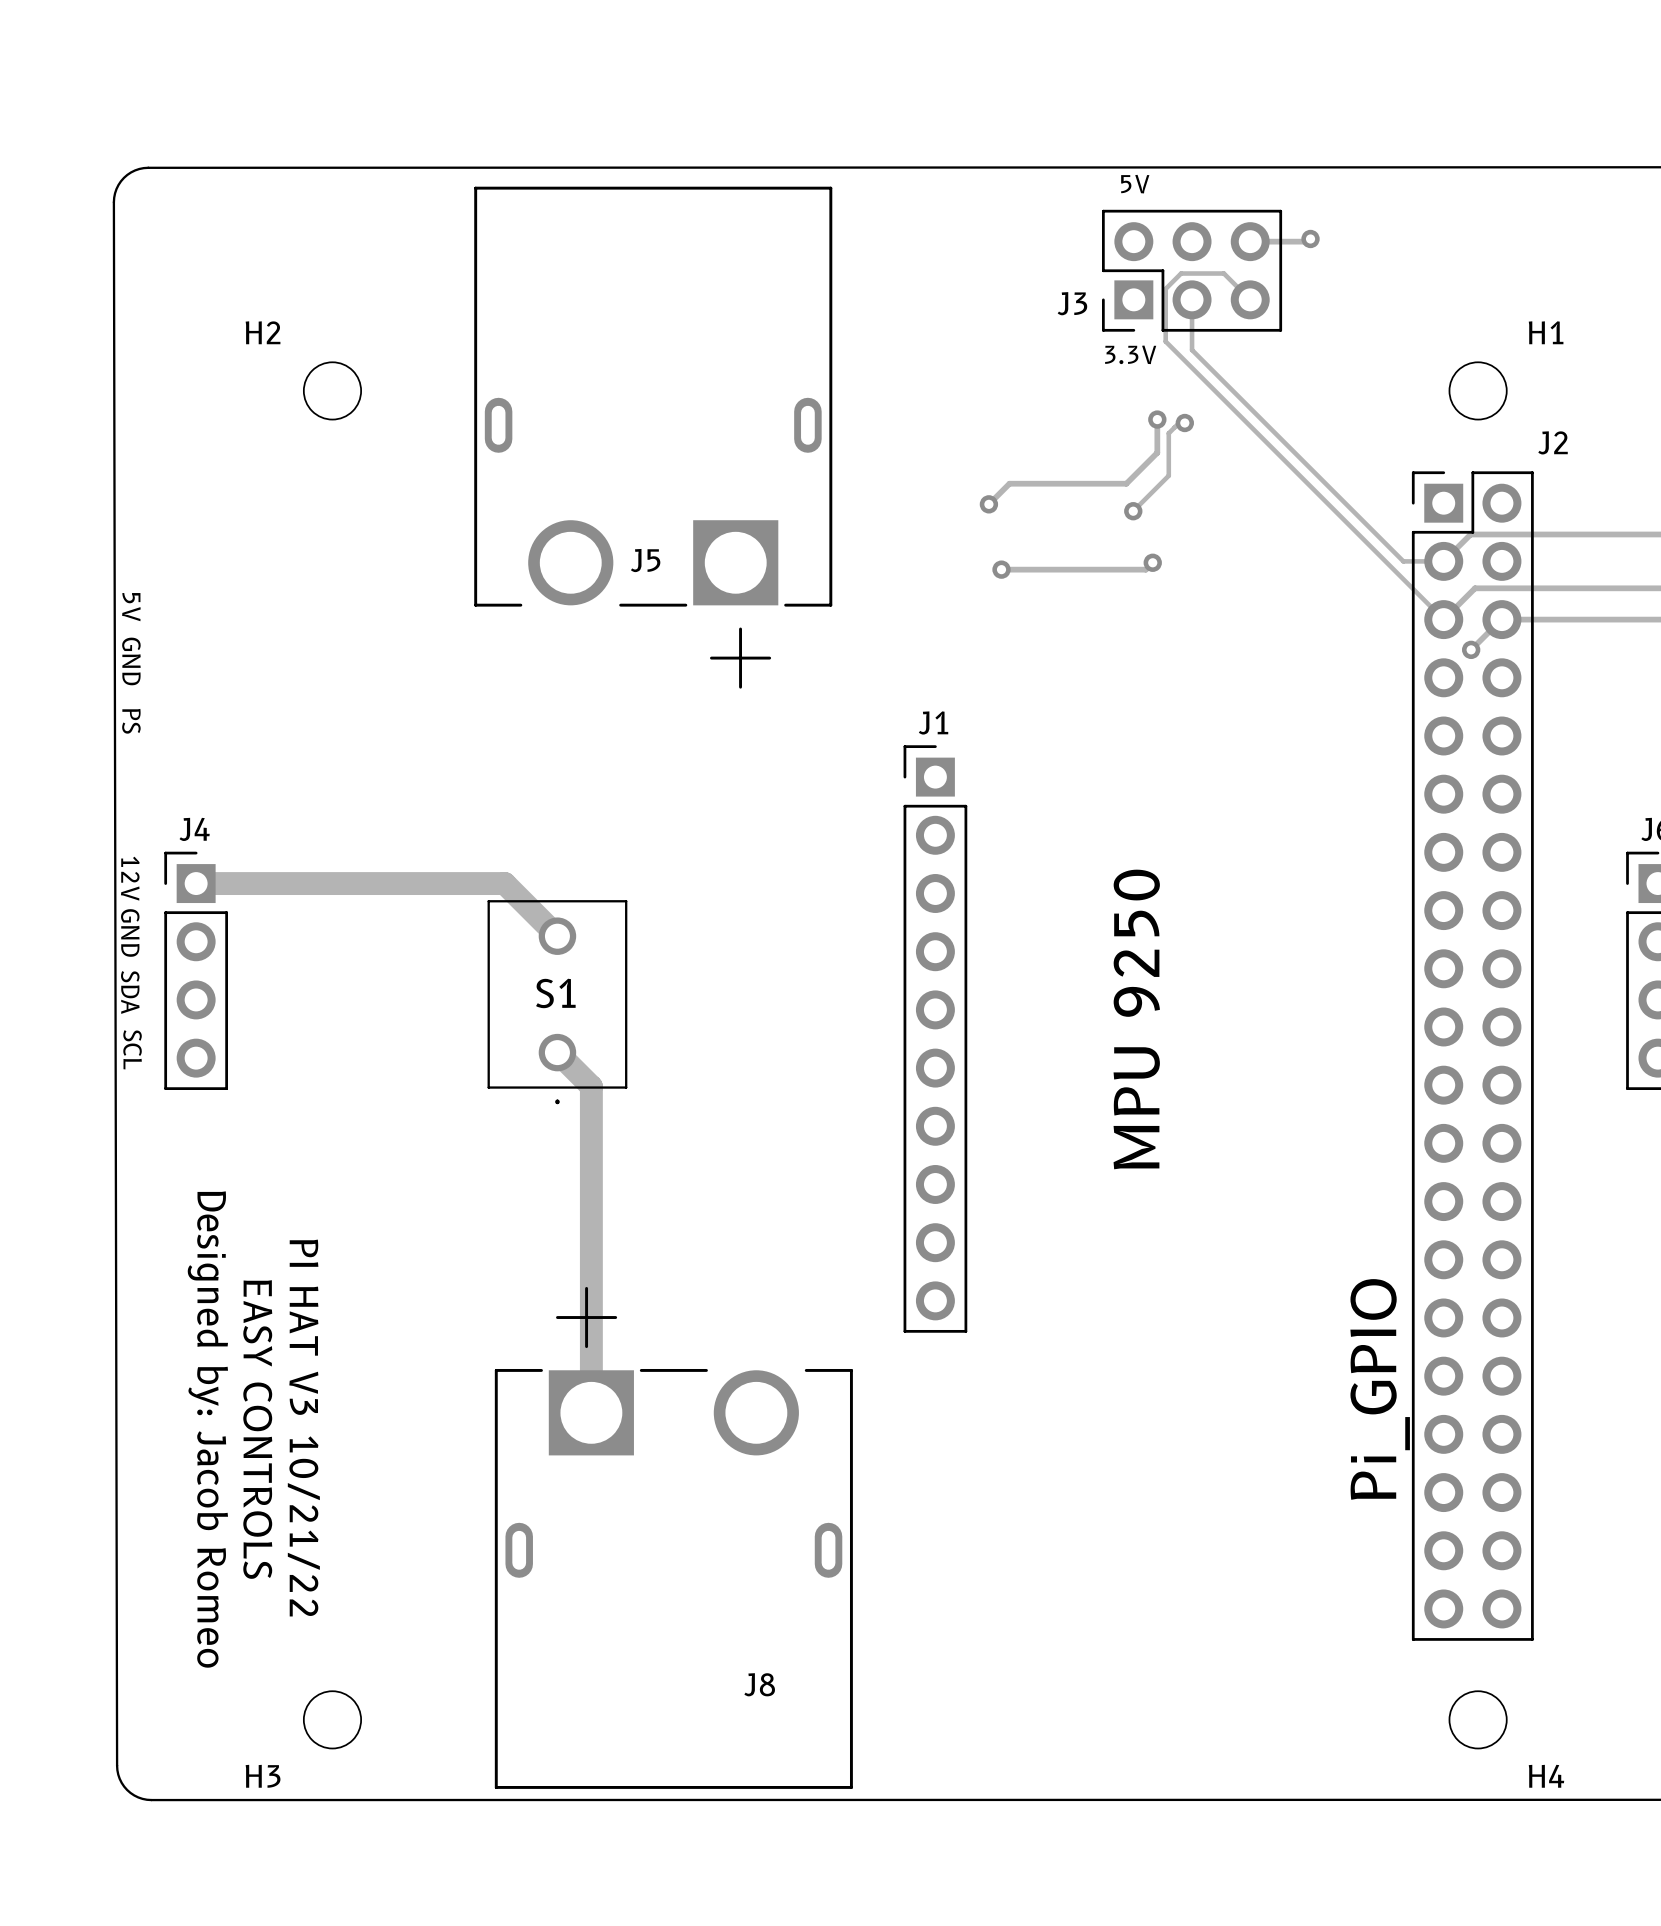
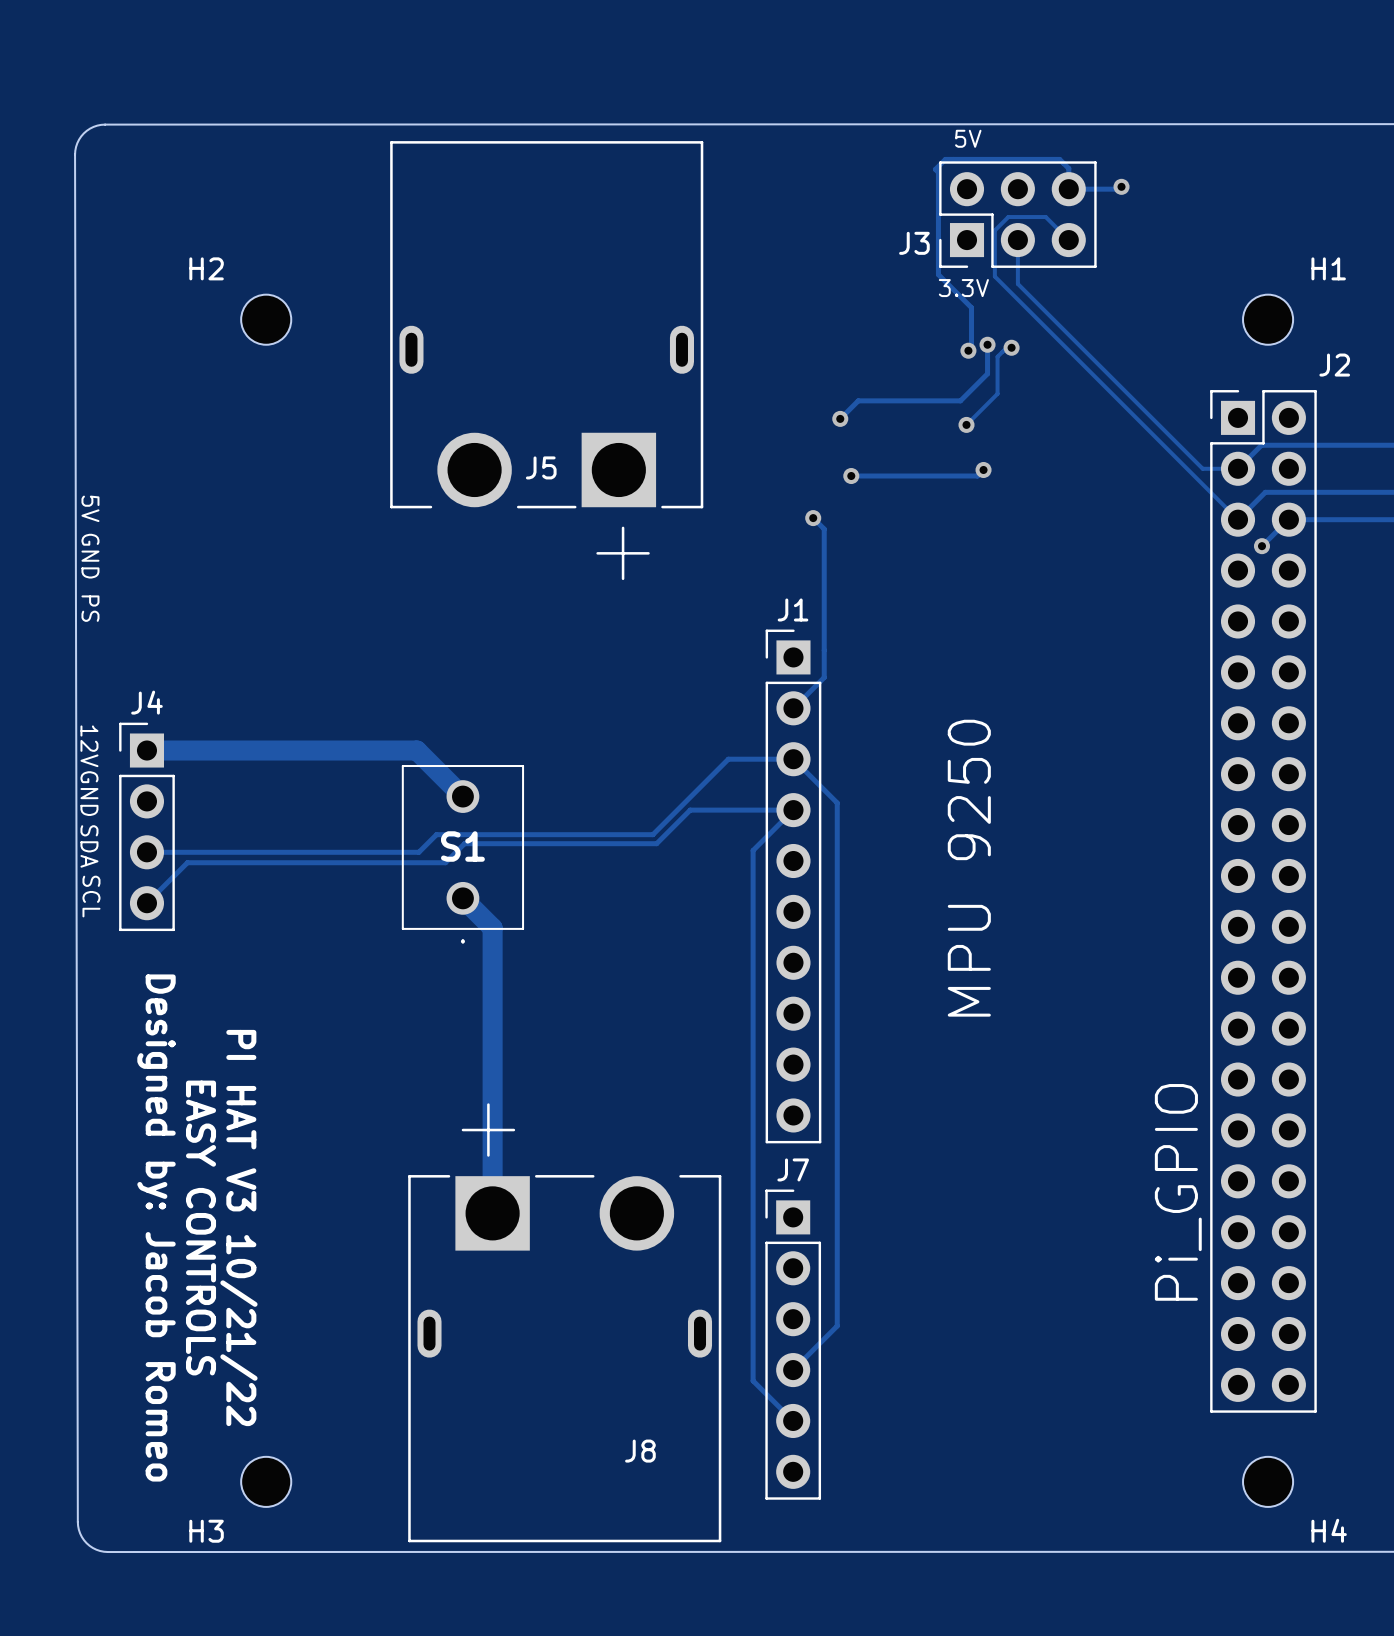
track: none -> (1068, 189) (1068, 168) (1059, 159) (945, 159) (935, 169) (938, 172) (938, 274) (971, 307) (971, 347) (968, 350)
via: none -> (968, 350)
track: none -> (813, 518) (824, 529) (824, 677) (793, 708)
via: none -> (813, 518)
track: none -> (146, 852) (418, 852) (436, 834) (652, 834) (728, 759) (793, 759) (837, 803) (837, 1325) (793, 1370)
track: none -> (146, 903) (187, 862) (445, 862) (464, 843) (656, 843) (690, 810) (793, 810) (753, 850) (753, 1380) (793, 1420)
J7: none -> (793, 1344)

